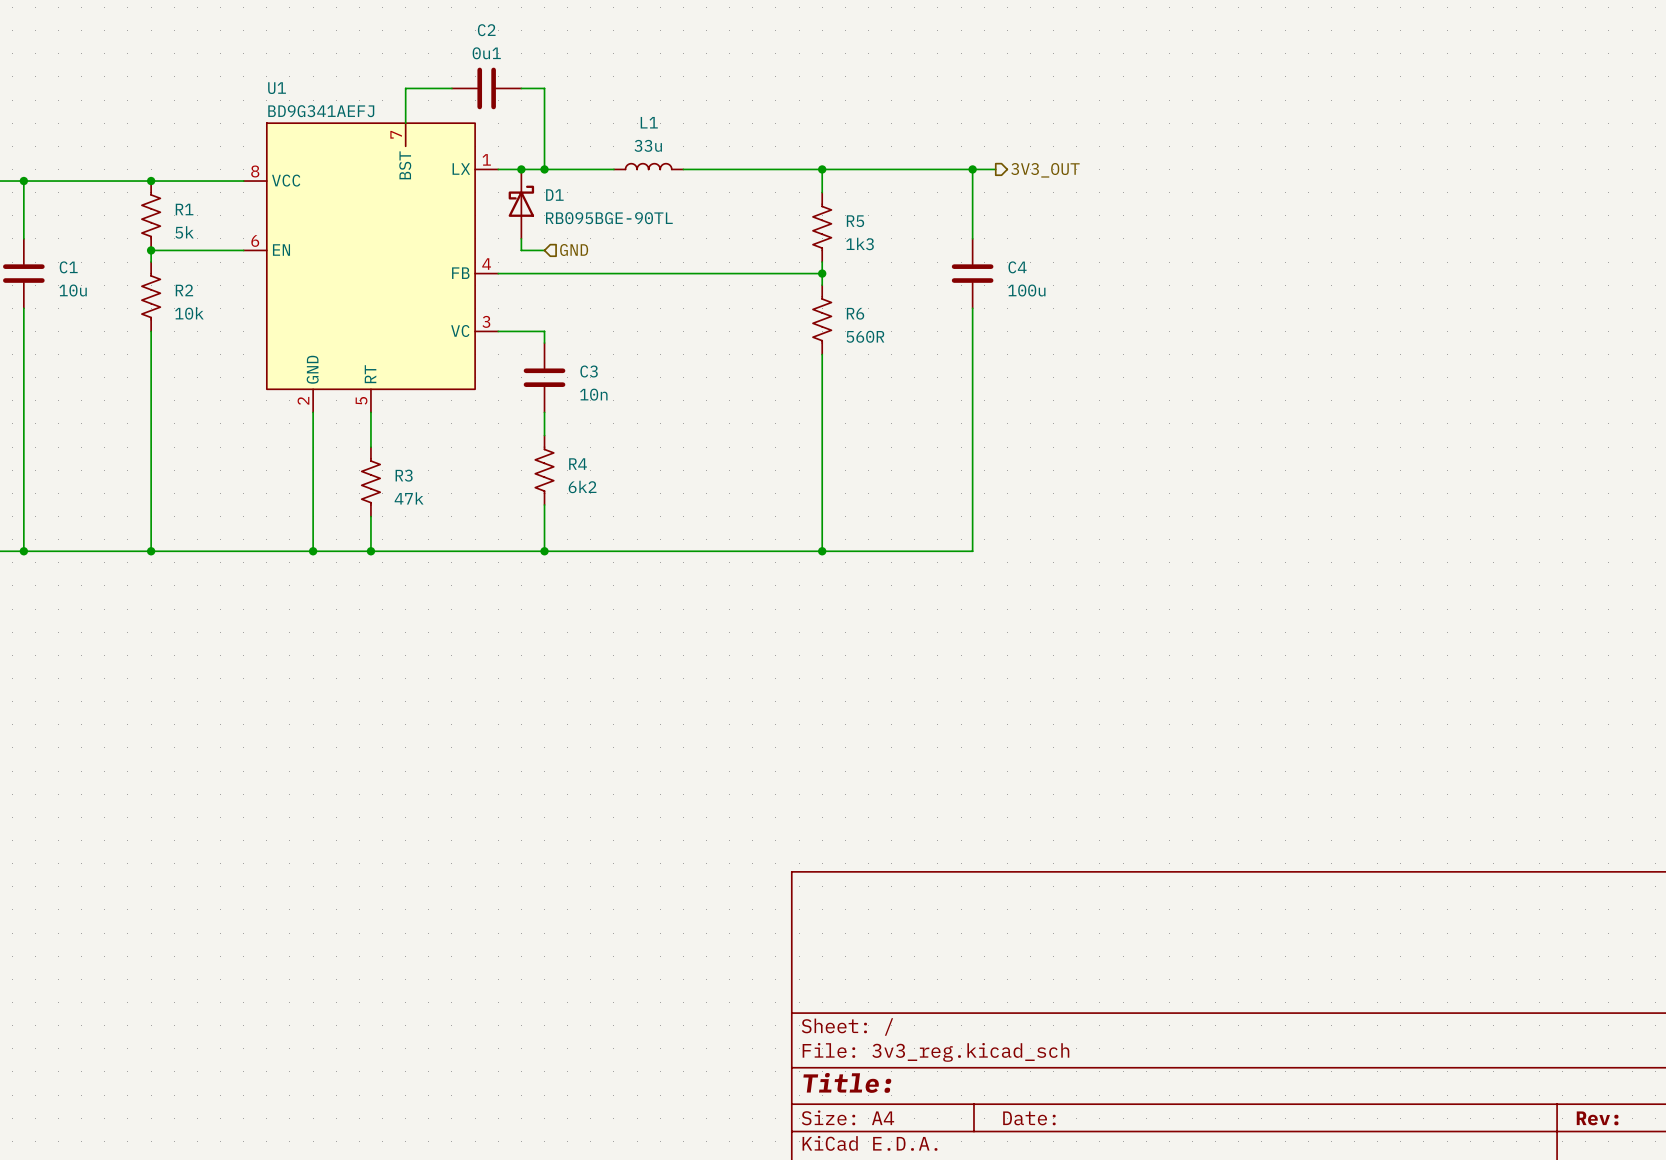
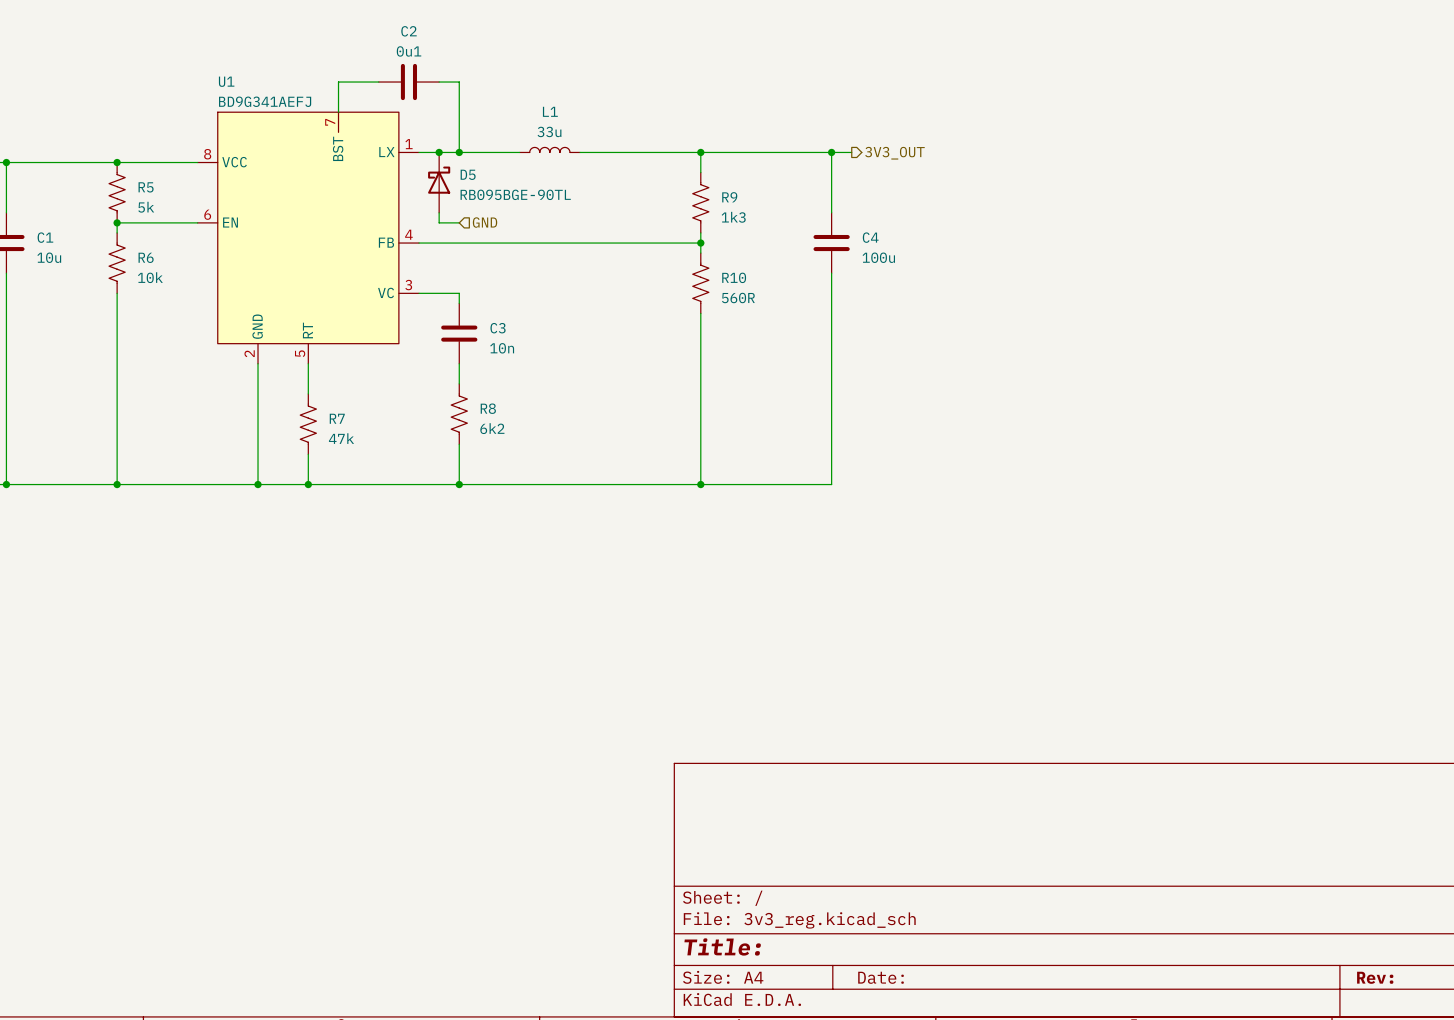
D1 name: D1 (554, 195) -> D5 (468, 174)
R1 name: R1 (184, 209) -> R5 (146, 187)
R5 name: R5 (855, 221) -> R9 (729, 197)
R2 name: R2 (184, 290) -> R6 (146, 257)
R6 name: R6 (855, 313) -> R10 (734, 277)
R4 name: R4 (578, 464) -> R8 (488, 408)
R3 name: R3 (404, 475) -> R7 (337, 418)

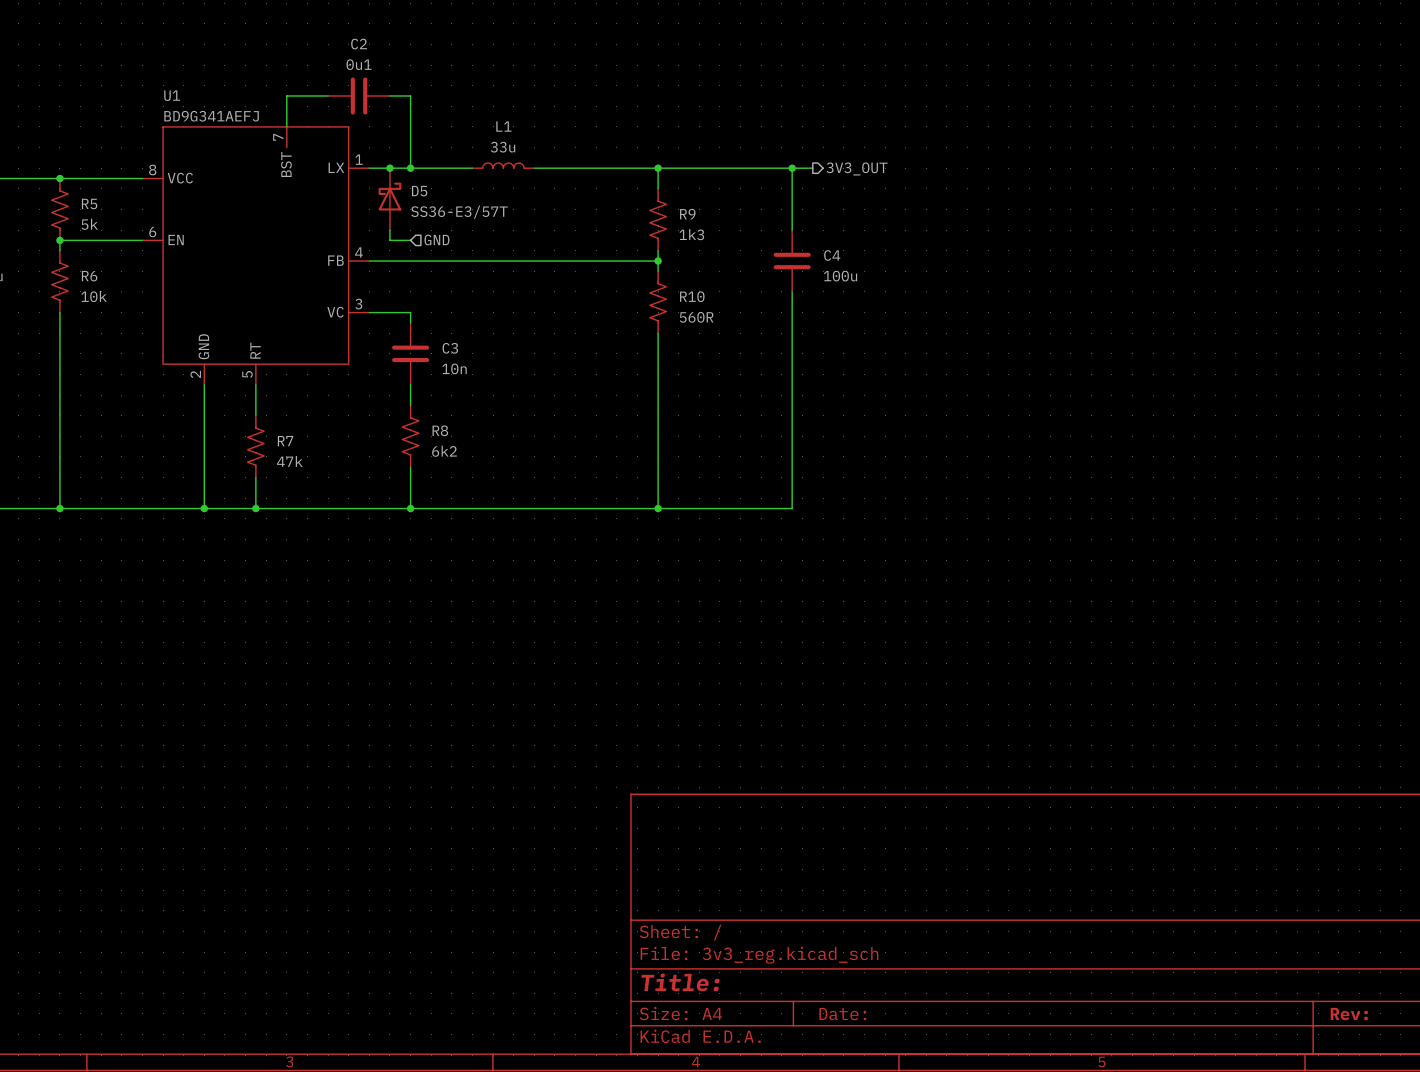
D5 value: RB095BGE-90TL (515, 194) -> SS36-E3/57T (459, 212)

